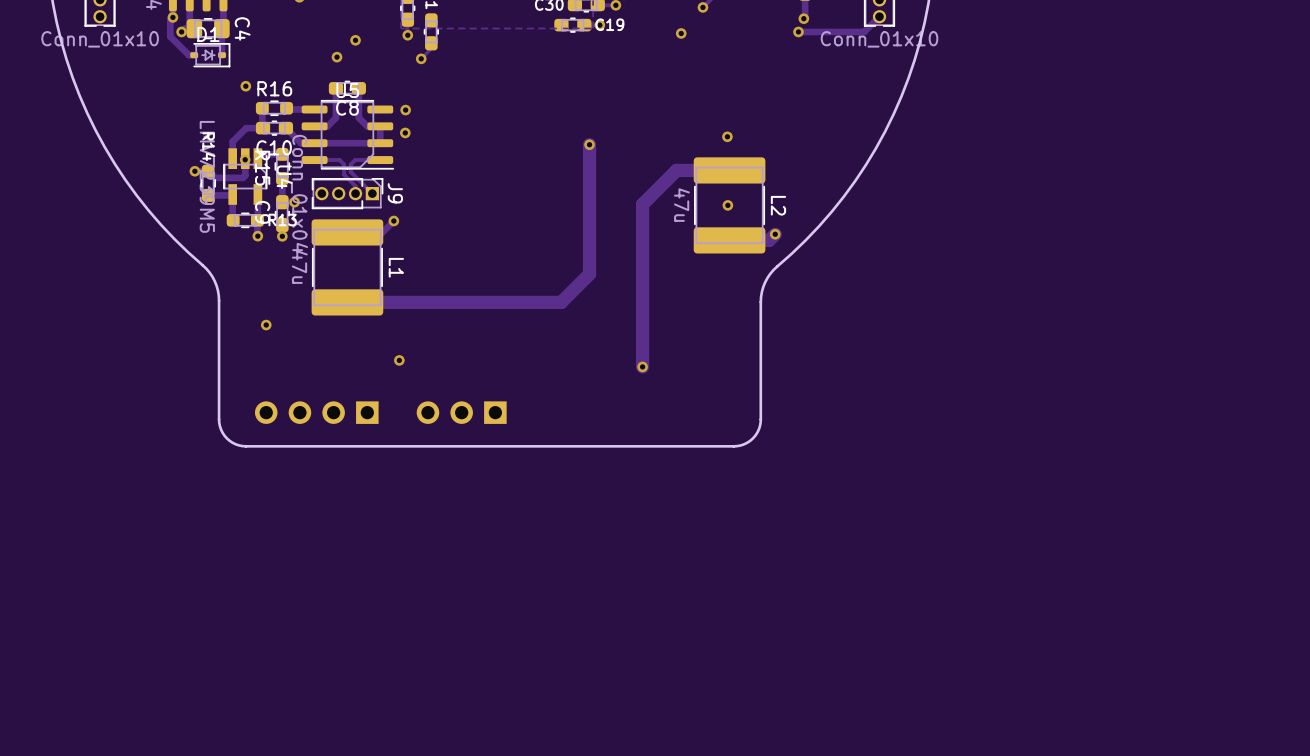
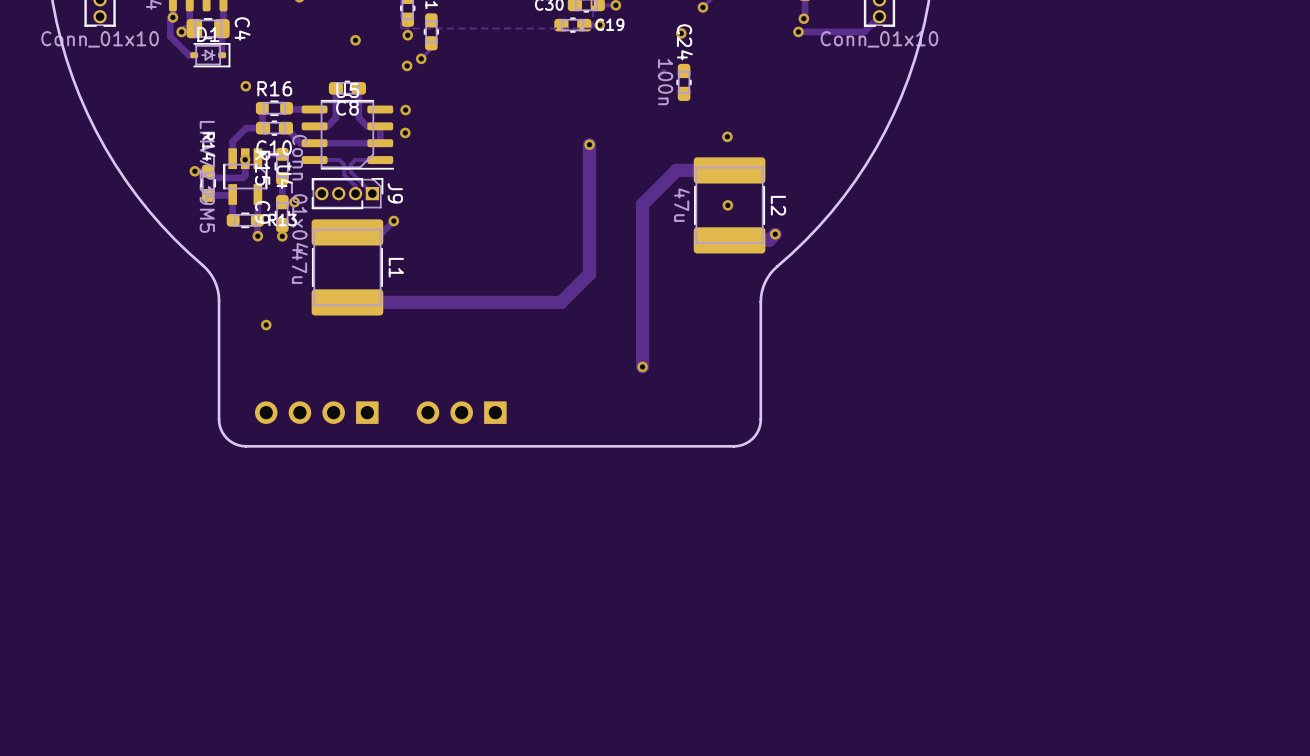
via position: (337, 57) -> (407, 65)
track: none -> (663, 70) (659, 75)
C24: none -> 100n (684, 82)
via: (399, 360) -> none

